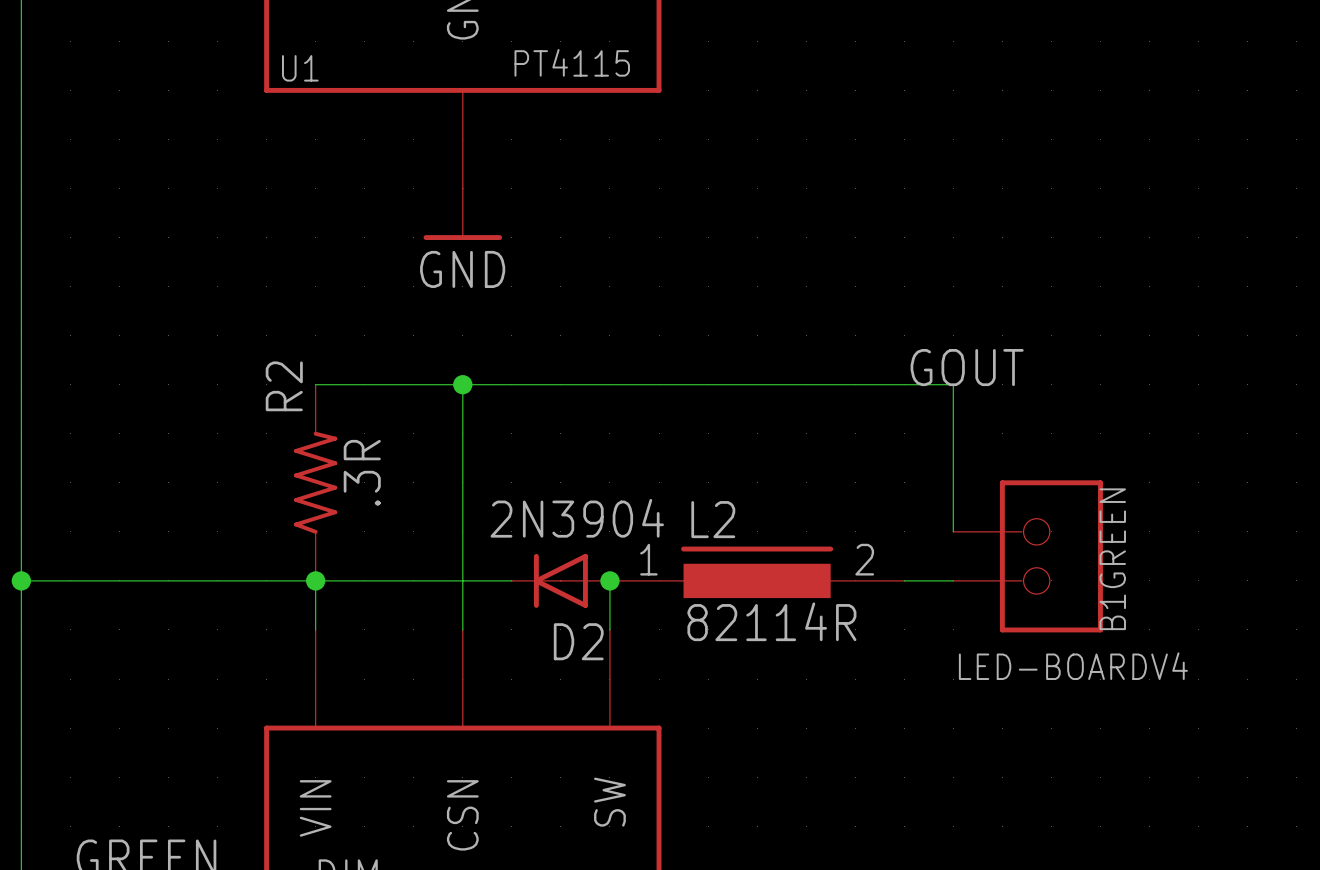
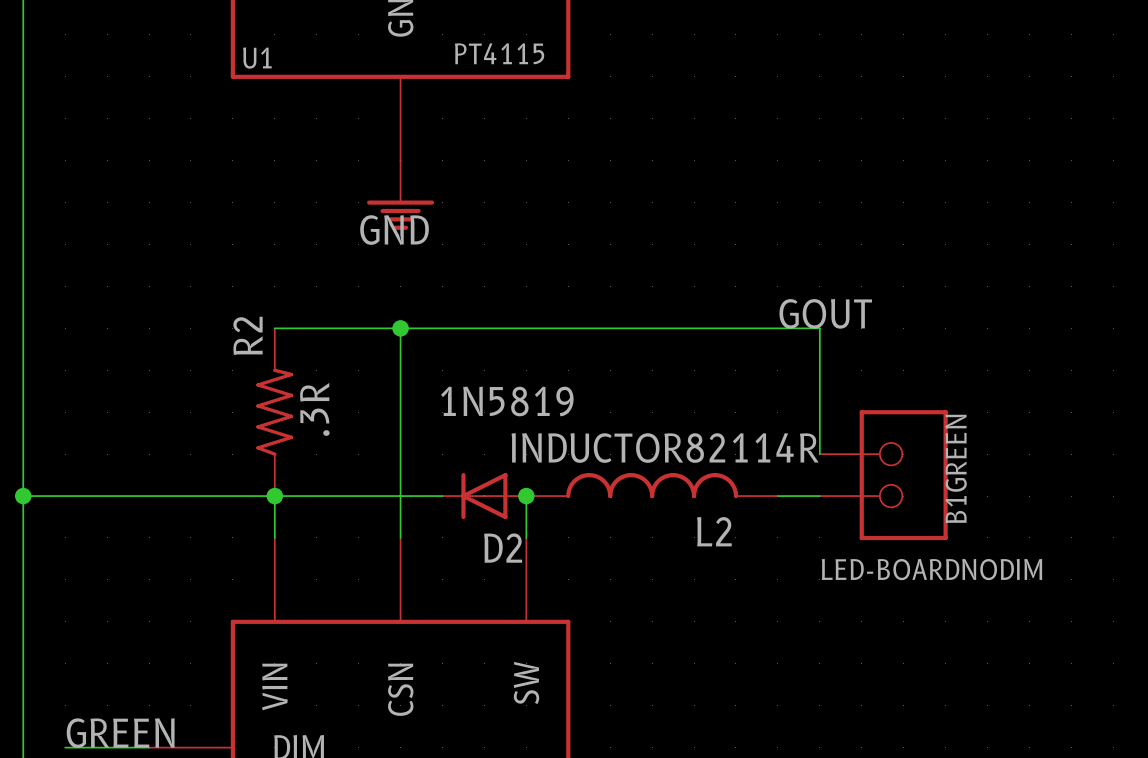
power symbol shape: [423, 188, 503, 241] -> [367, 160, 435, 230]
D2 value: 2N3904 (577, 518) -> 1N5819 (507, 401)
L2 name position: L2 (713, 519) -> L2 (714, 531)
L2 symbol: [609, 546, 905, 599] -> [526, 473, 778, 499]
L2 value: 82114R (771, 621) -> INDUCTOR82114R (665, 448)
B1GREEN value: LED-BOARDV4 (1073, 666) -> LED-BOARDNODIM (931, 569)

